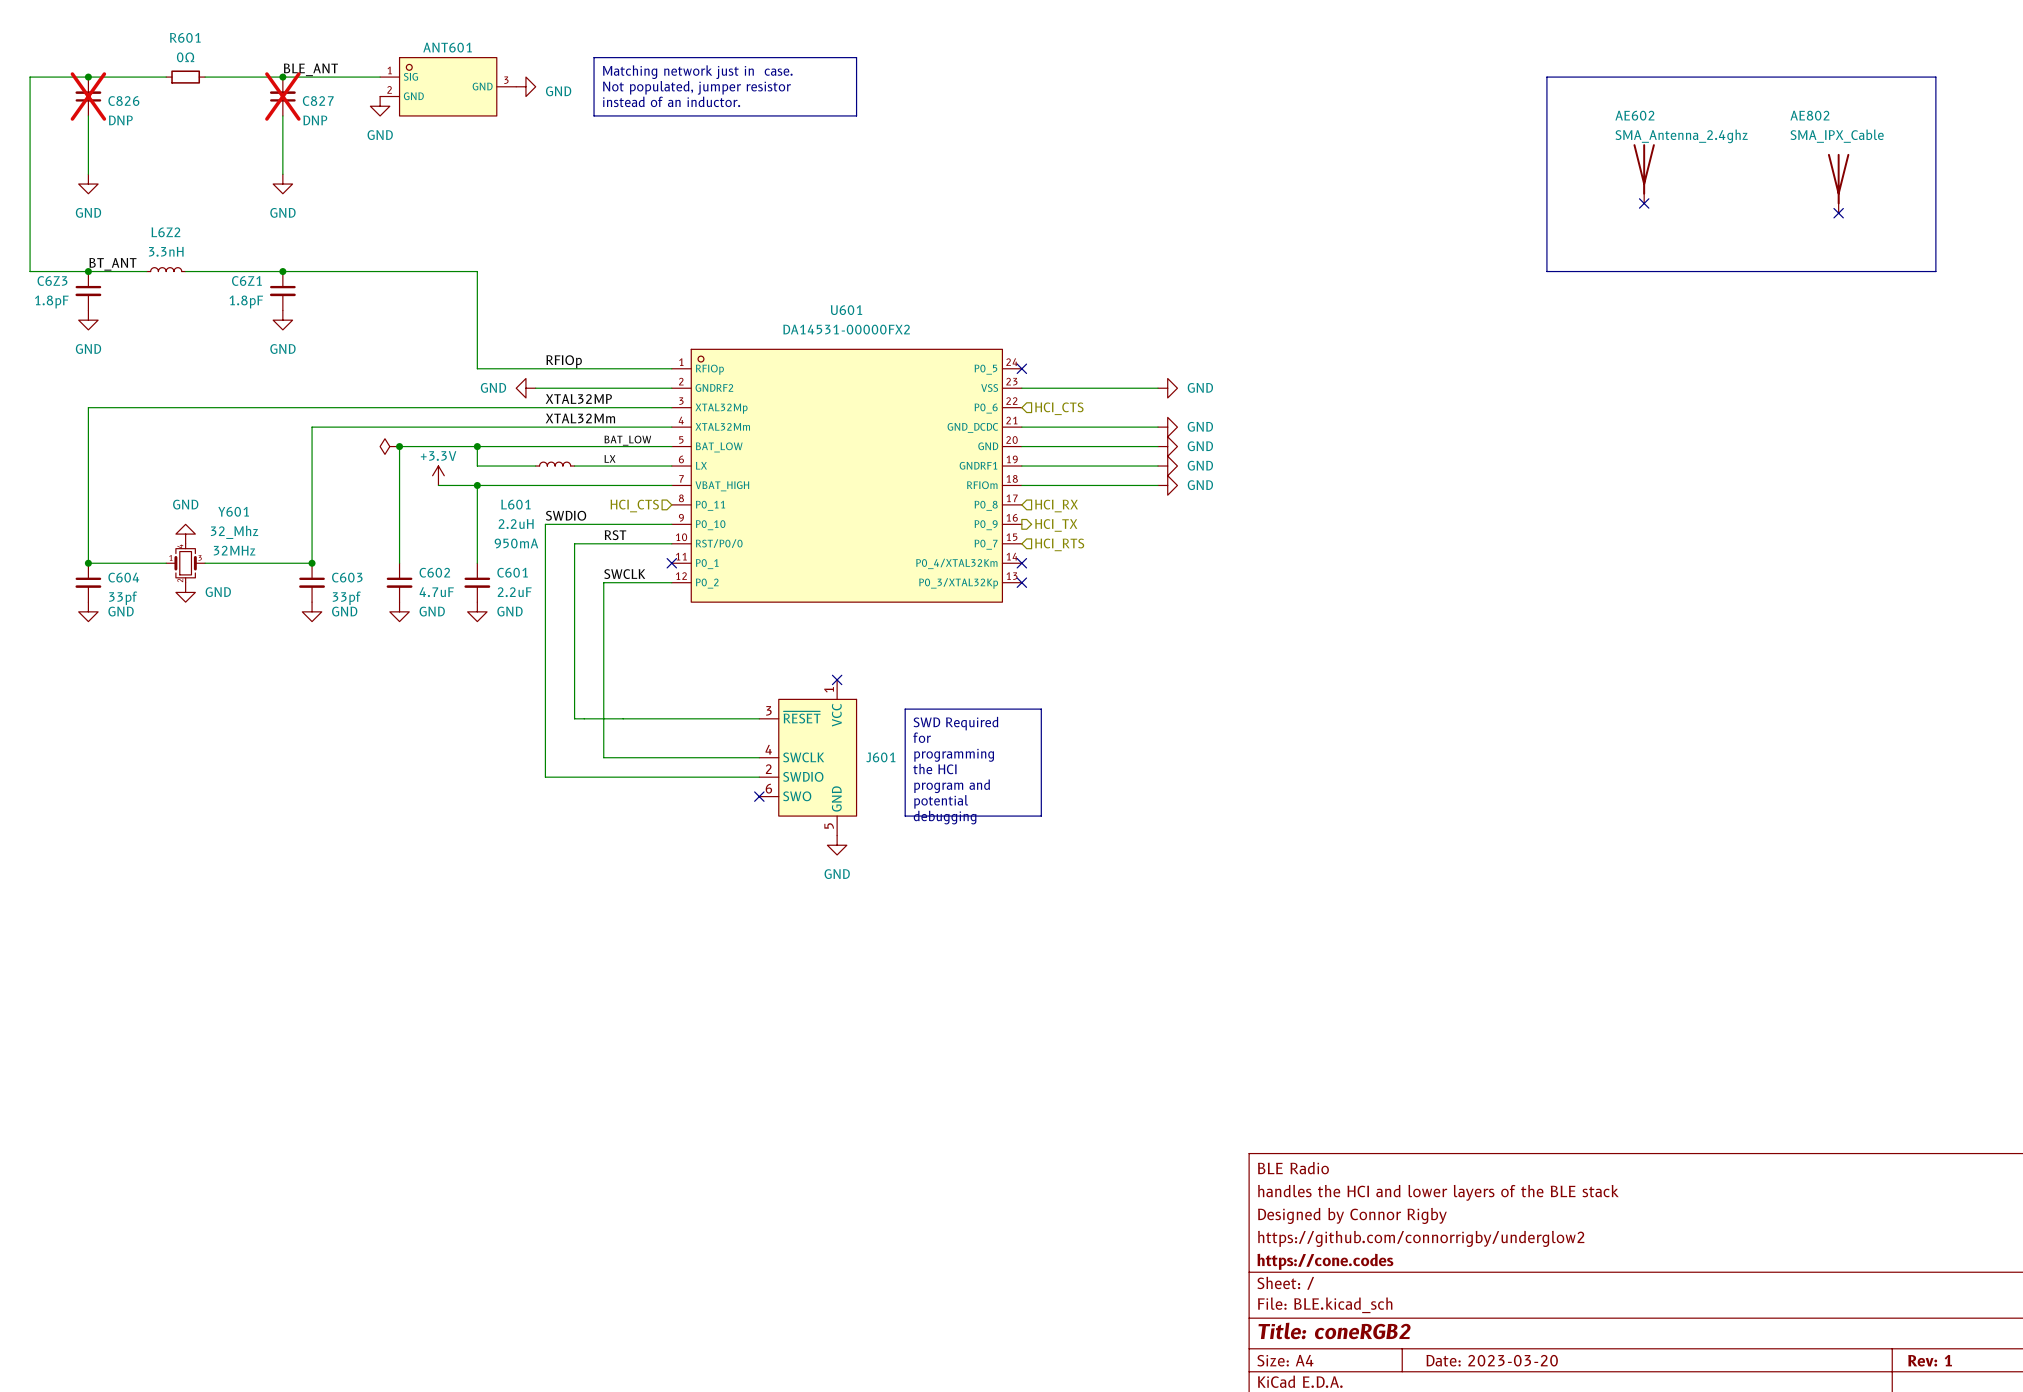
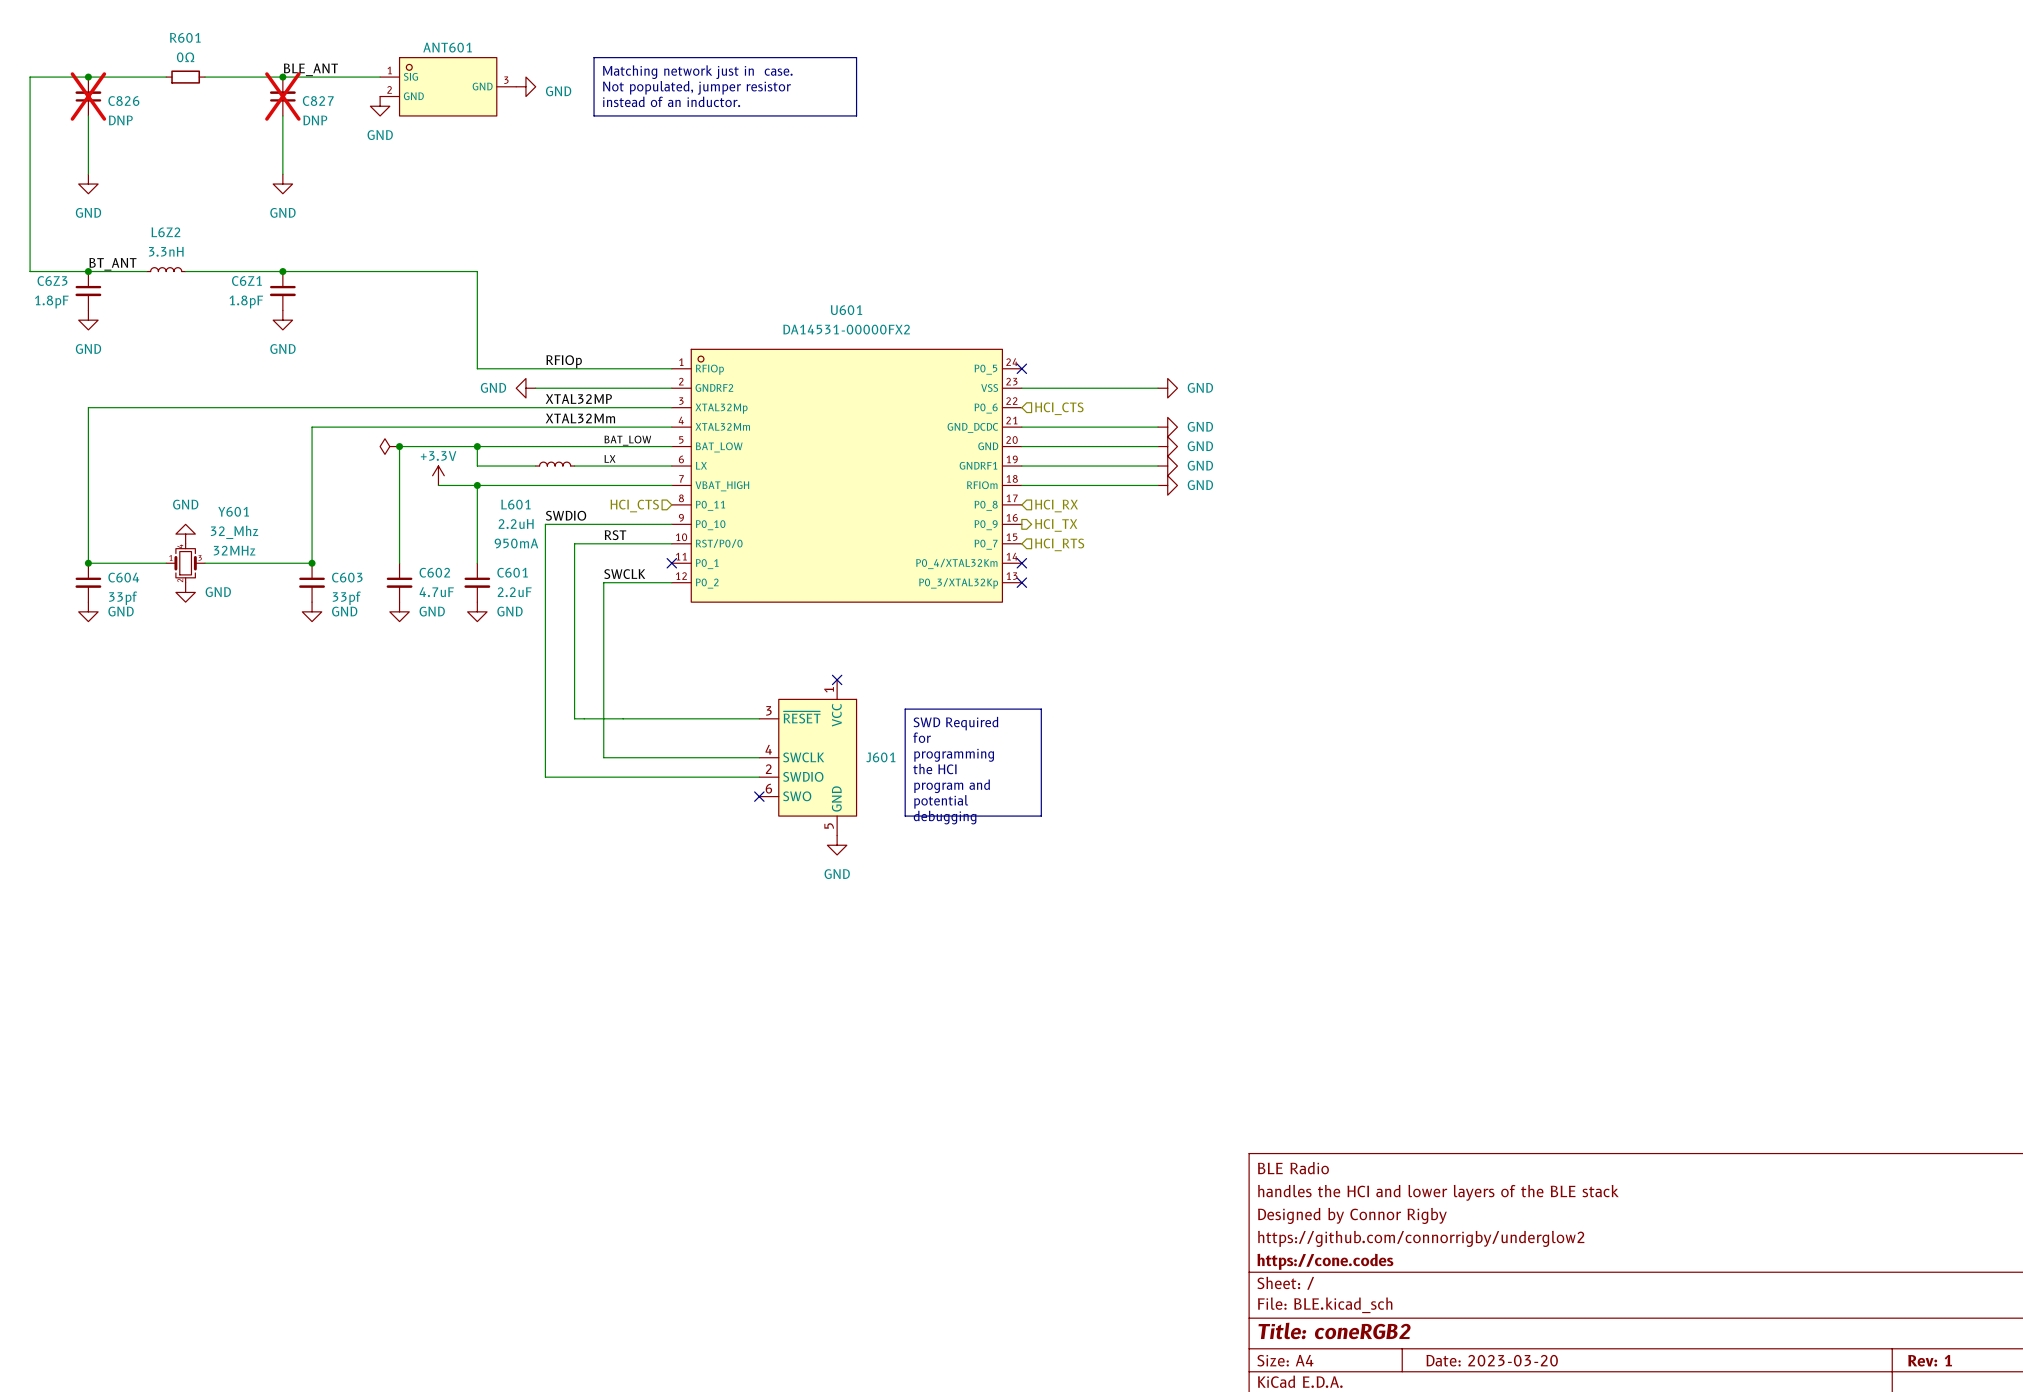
line: (1546, 77) (1935, 77) (1935, 271) (1546, 271) (1546, 77) -> none
AE602: SMA_Antenna_2.4ghz (1644, 173) -> none
AE802: SMA_IPX_Cable (1838, 183) -> none
no-connect mark: (1644, 203) -> none
no-connect mark: (1838, 213) -> none

